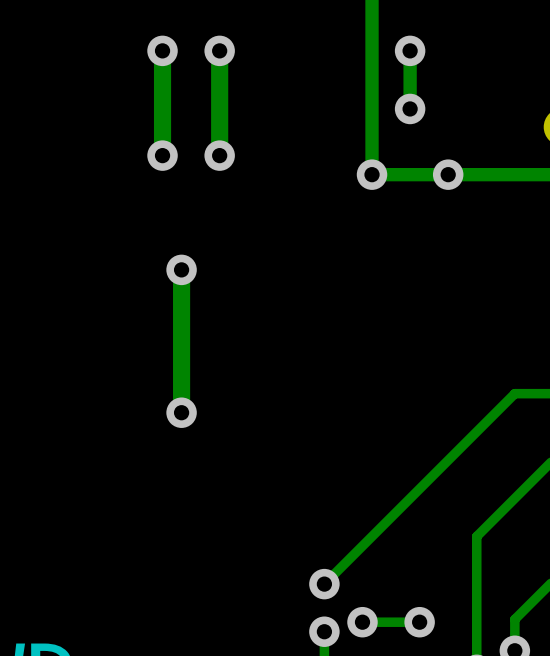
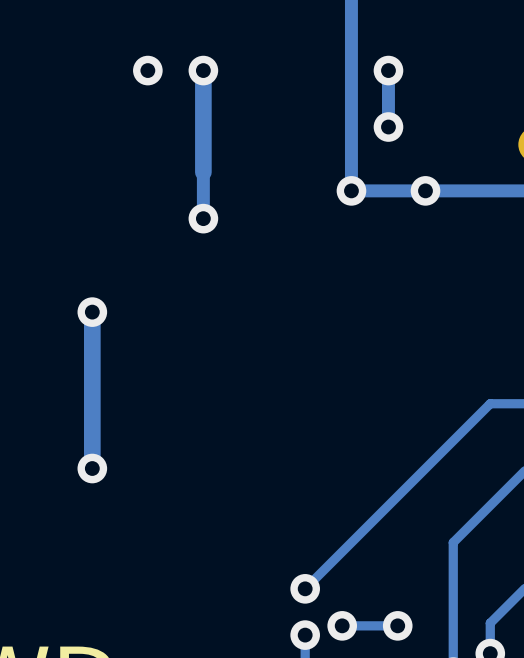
track: (162, 50) (162, 155) -> none
via: (162, 155) -> none
track: none -> (203, 172) (203, 218)
via: (219, 155) -> none
via: none -> (203, 218)
track: (181, 269) (181, 412) -> none
via: (181, 269) -> none
track: none -> (92, 312) (92, 468)
via: none -> (92, 312)
via: (181, 412) -> none
via: none -> (92, 468)

